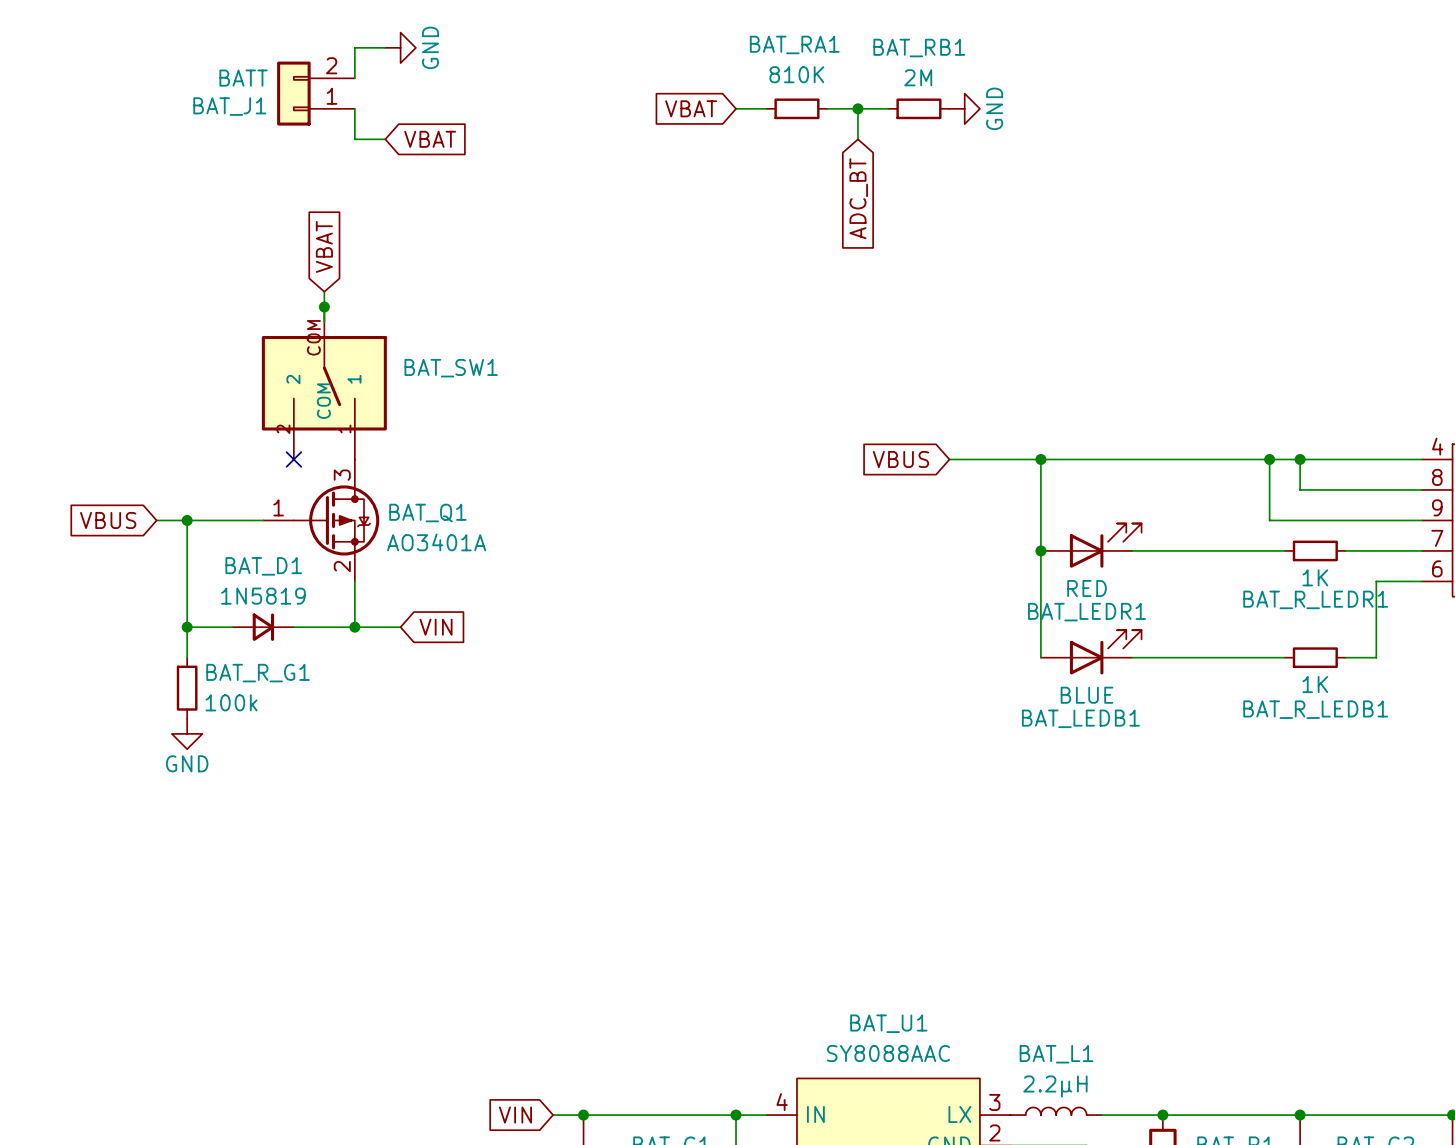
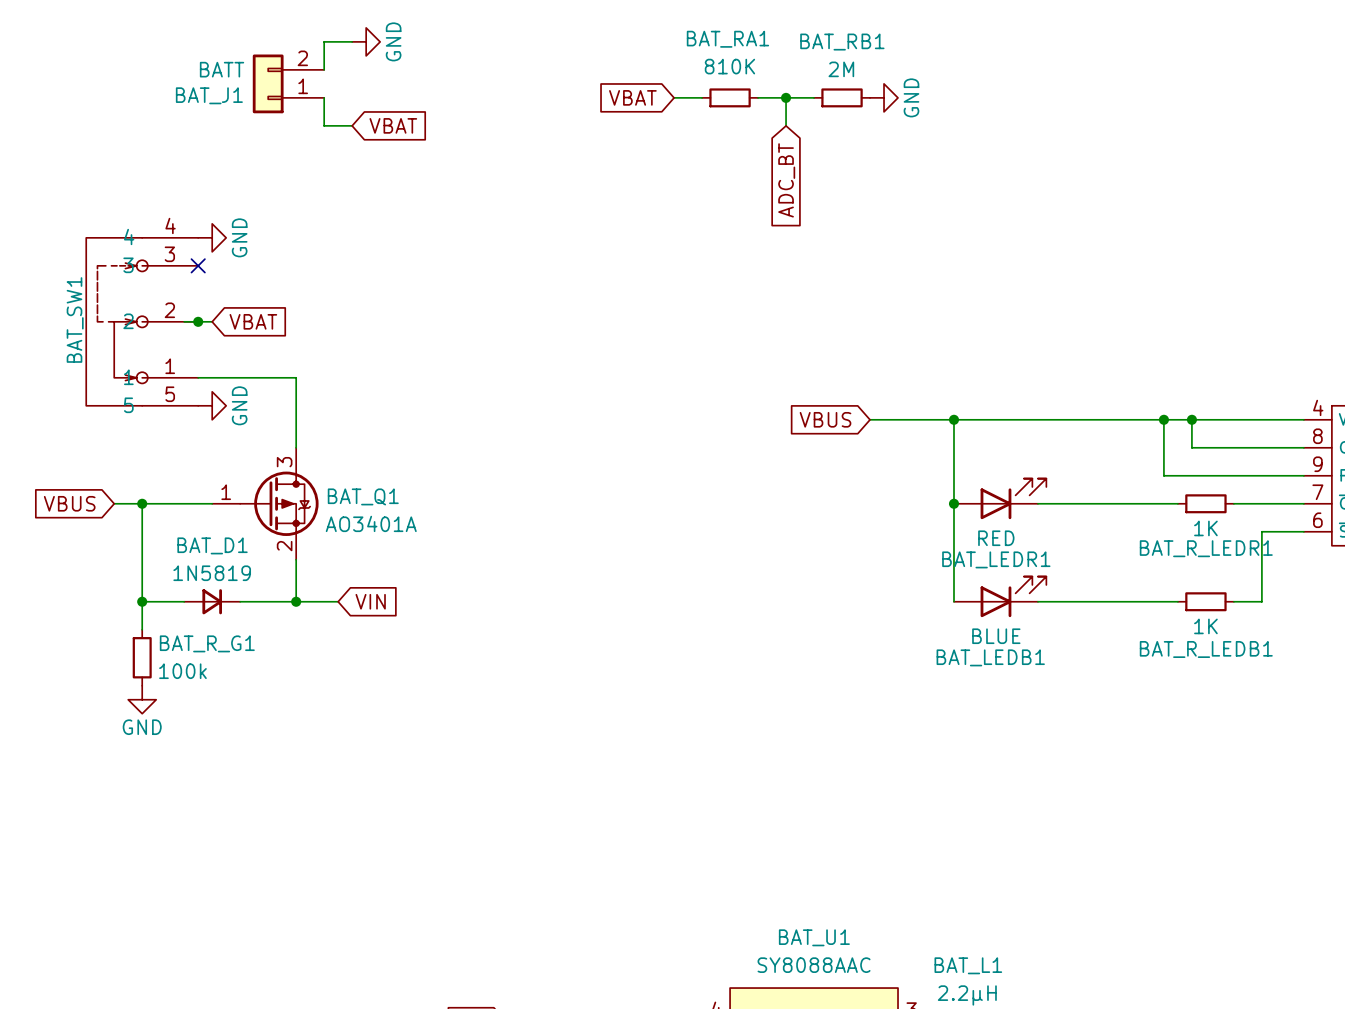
global label rotation: 0° (324, 246) -> 90° clockwise (253, 321)
global label position: VBAT (324, 246) -> VBAT (253, 321)
power symbol: none -> GND (212, 237)
no-connect mark: none -> (198, 265)
wire: (324, 291) (324, 322) -> none
BAT_SW1 symbol: [261, 307, 387, 460] -> [86, 237, 199, 406]
junction: (324, 307) -> none
wire: none -> (184, 321) (212, 321)
junction: none -> (198, 321)
BAT_SW1 name position: BAT_SW1 (451, 368) -> BAT_SW1 (75, 320)
wire: none -> (198, 377) (296, 377) (296, 447)
power symbol: none -> GND (212, 405)
no-connect mark: (293, 459) -> none
global label position: VBUS (108, 520) -> VBUS (69, 503)
wire: (156, 520) (263, 520) -> (114, 503) (212, 503)
wire: (187, 520) (187, 657) -> (142, 503) (142, 629)
junction: (187, 520) -> none
BAT_Q1 position: (321, 520) -> (265, 503)
junction: none -> (142, 503)
wire: (354, 581) (354, 627) -> (296, 559) (296, 601)
wire: (187, 627) (232, 627) -> (142, 601) (184, 601)
junction: (187, 627) -> none
BAT_D1 position: (263, 627) -> (212, 601)
wire: (293, 627) (400, 627) -> (240, 601) (338, 601)
junction position: (354, 627) -> (296, 601)
global label position: VIN (436, 627) -> VIN (370, 601)
junction: none -> (142, 601)
BAT_R_G1 position: (187, 688) -> (142, 657)
power symbol position: GND (187, 733) -> GND (142, 699)

